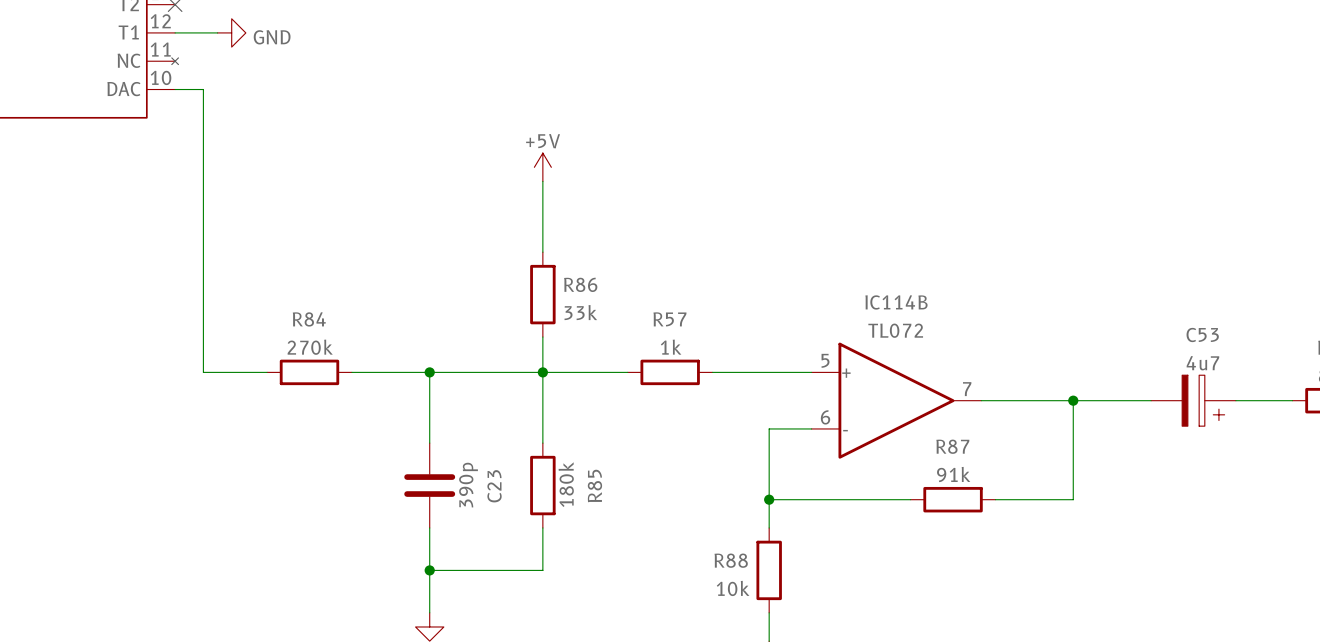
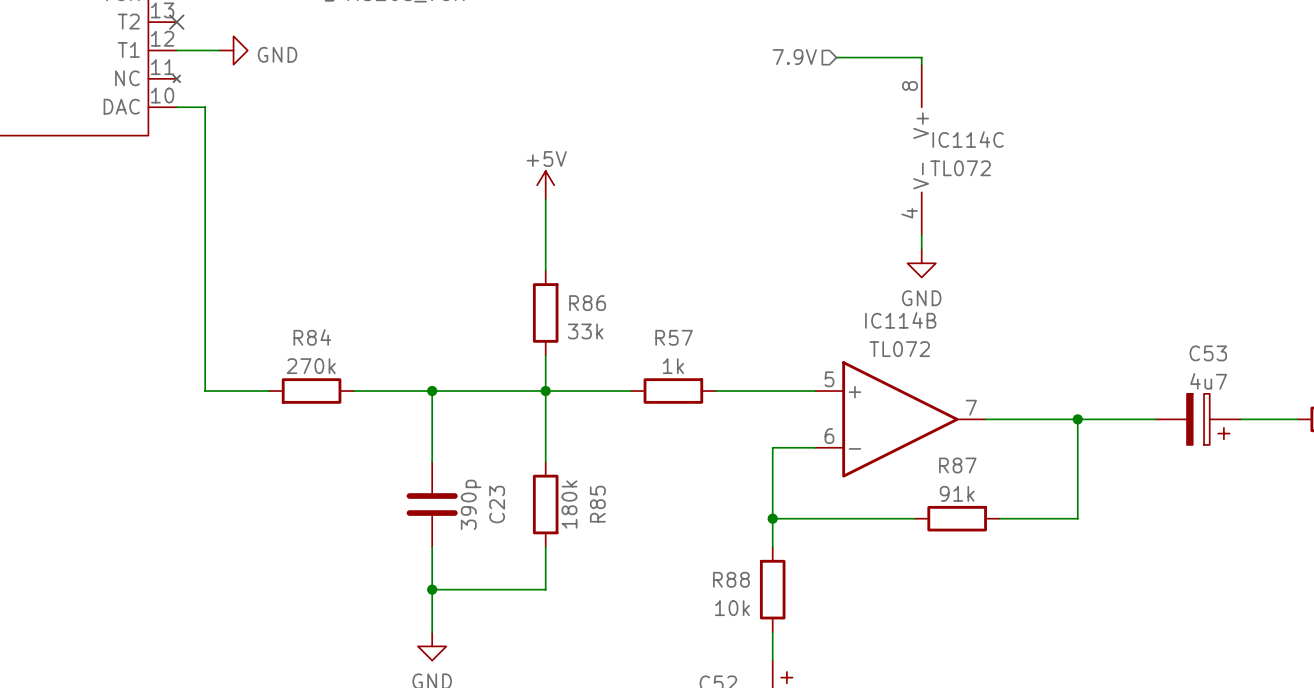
hierarchical label: none -> 7.9V (794, 57)
wire: none -> (836, 57) (921, 57) (921, 64)
IC114C: none -> TL072 (921, 149)
wire: none -> (921, 234) (921, 249)
power symbol: none -> GND (921, 263)

